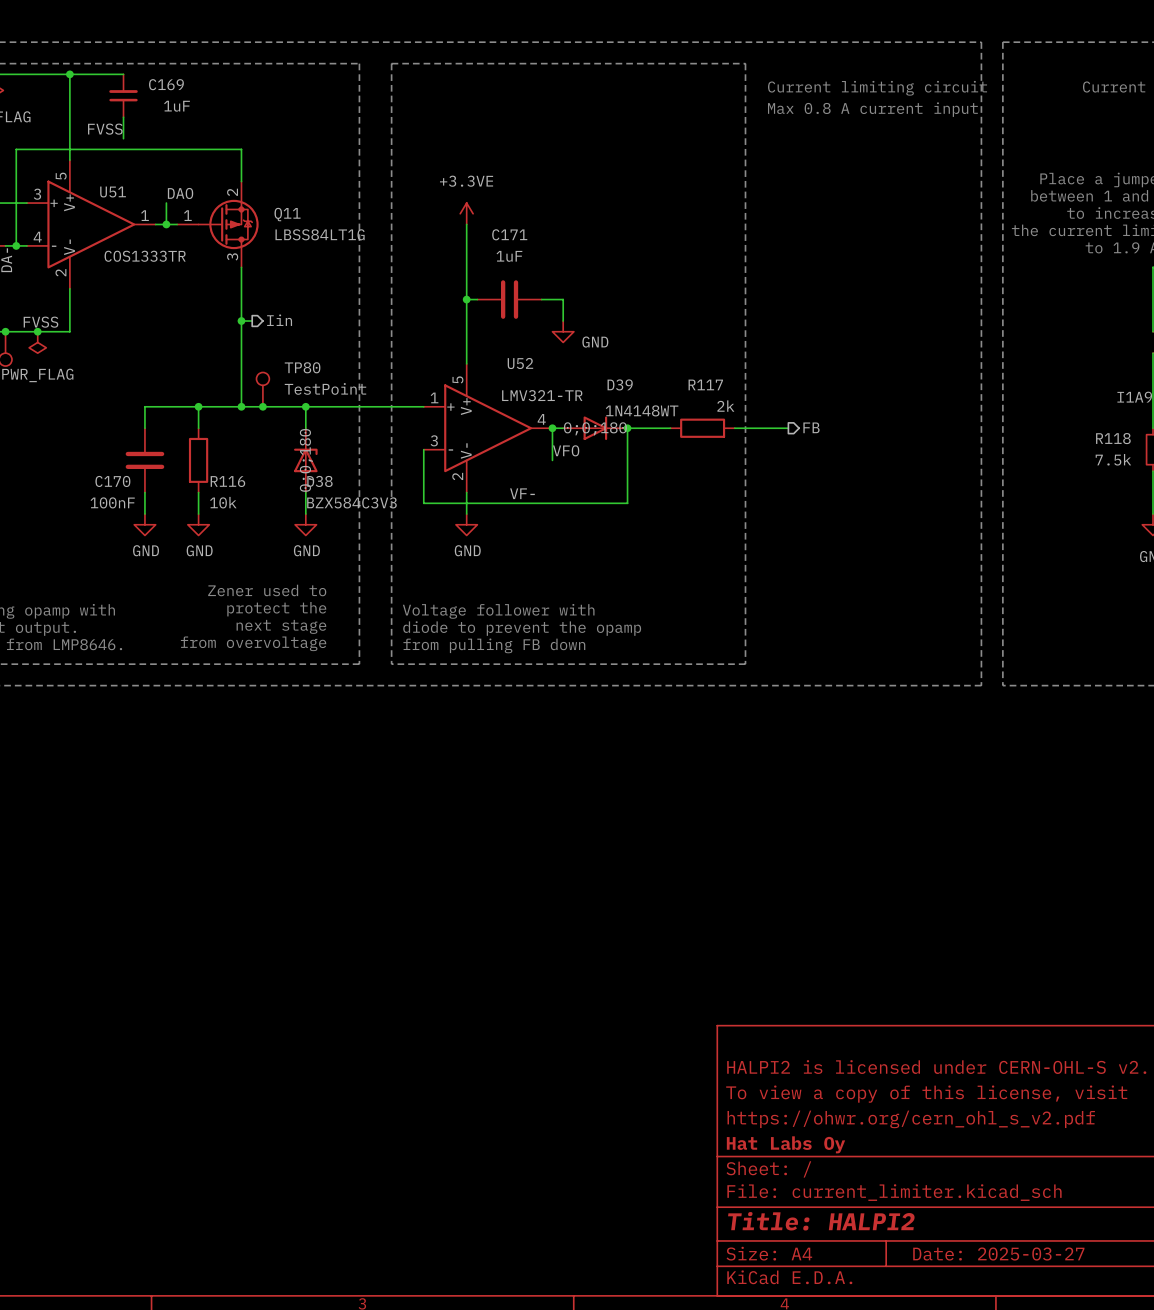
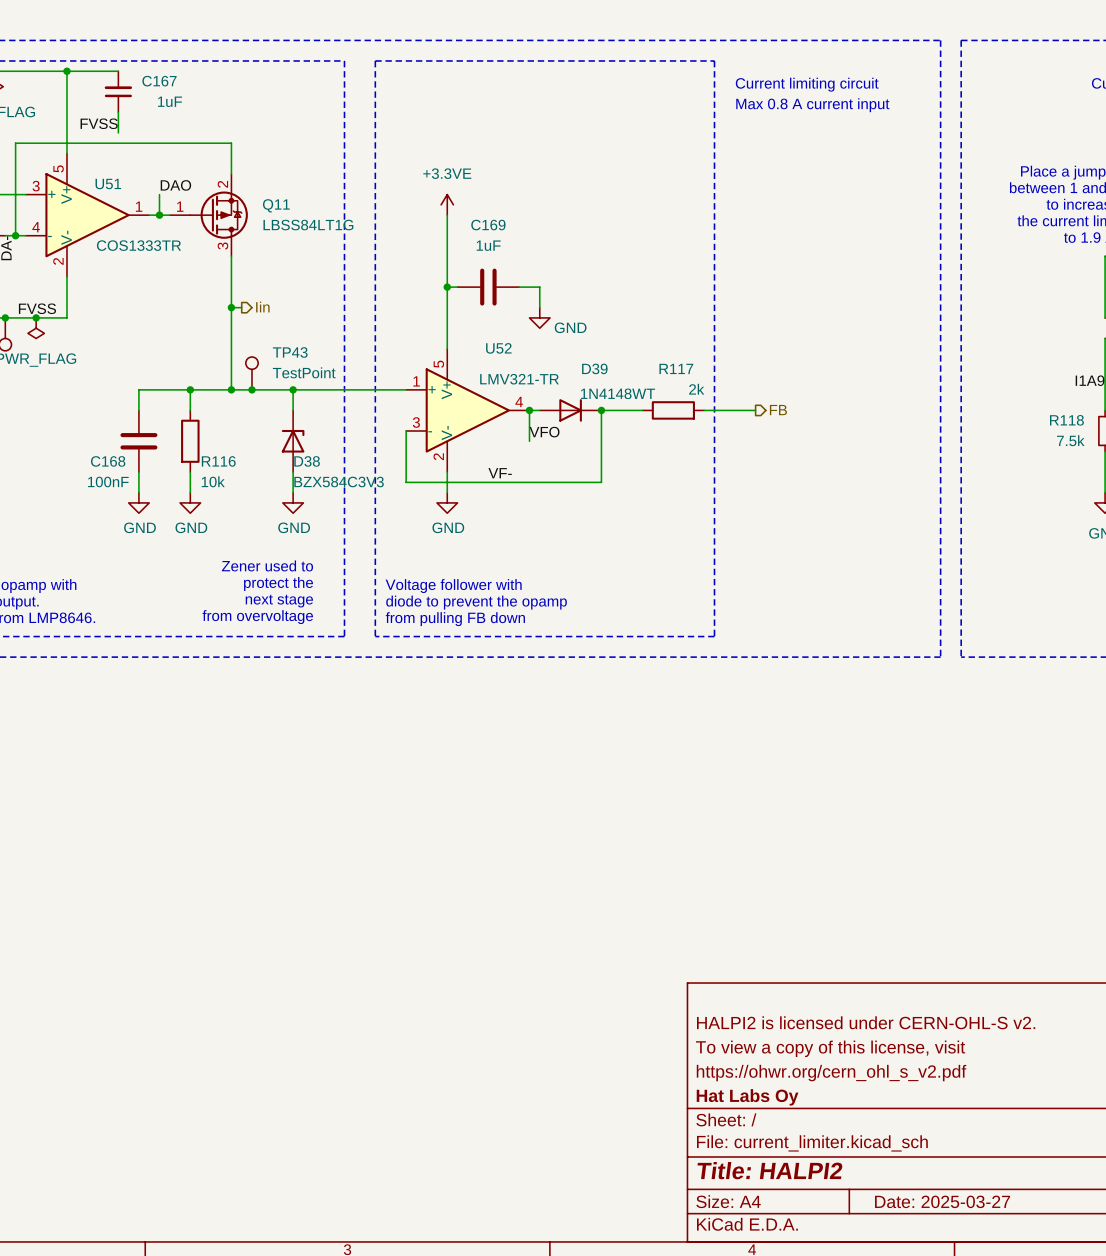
C169 name: C169 (166, 84) -> C167 (159, 81)
C171 name: C171 (509, 234) -> C169 (488, 225)
TP80 name: TP80 (302, 367) -> TP43 (290, 352)
D39 text: 0;0;180 (595, 428) -> none
D38 text: 0;0;180 (306, 460) -> none
C170 name: C170 (112, 481) -> C168 (108, 461)

